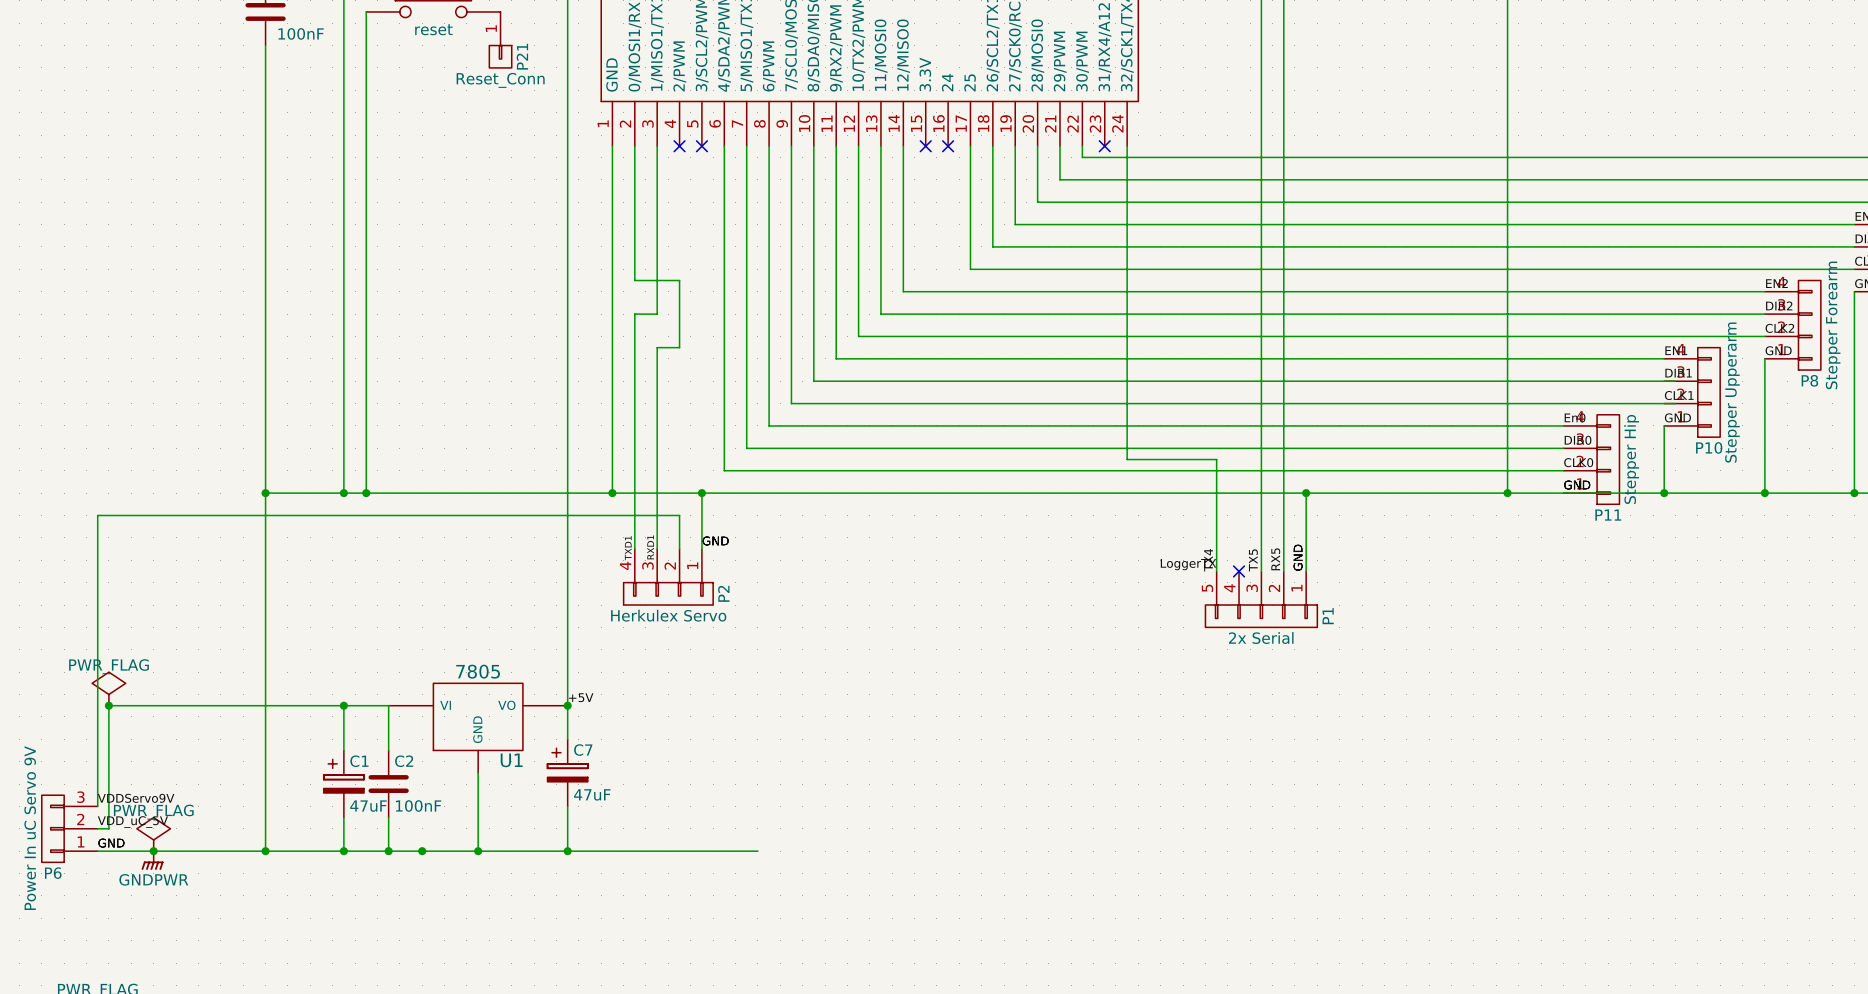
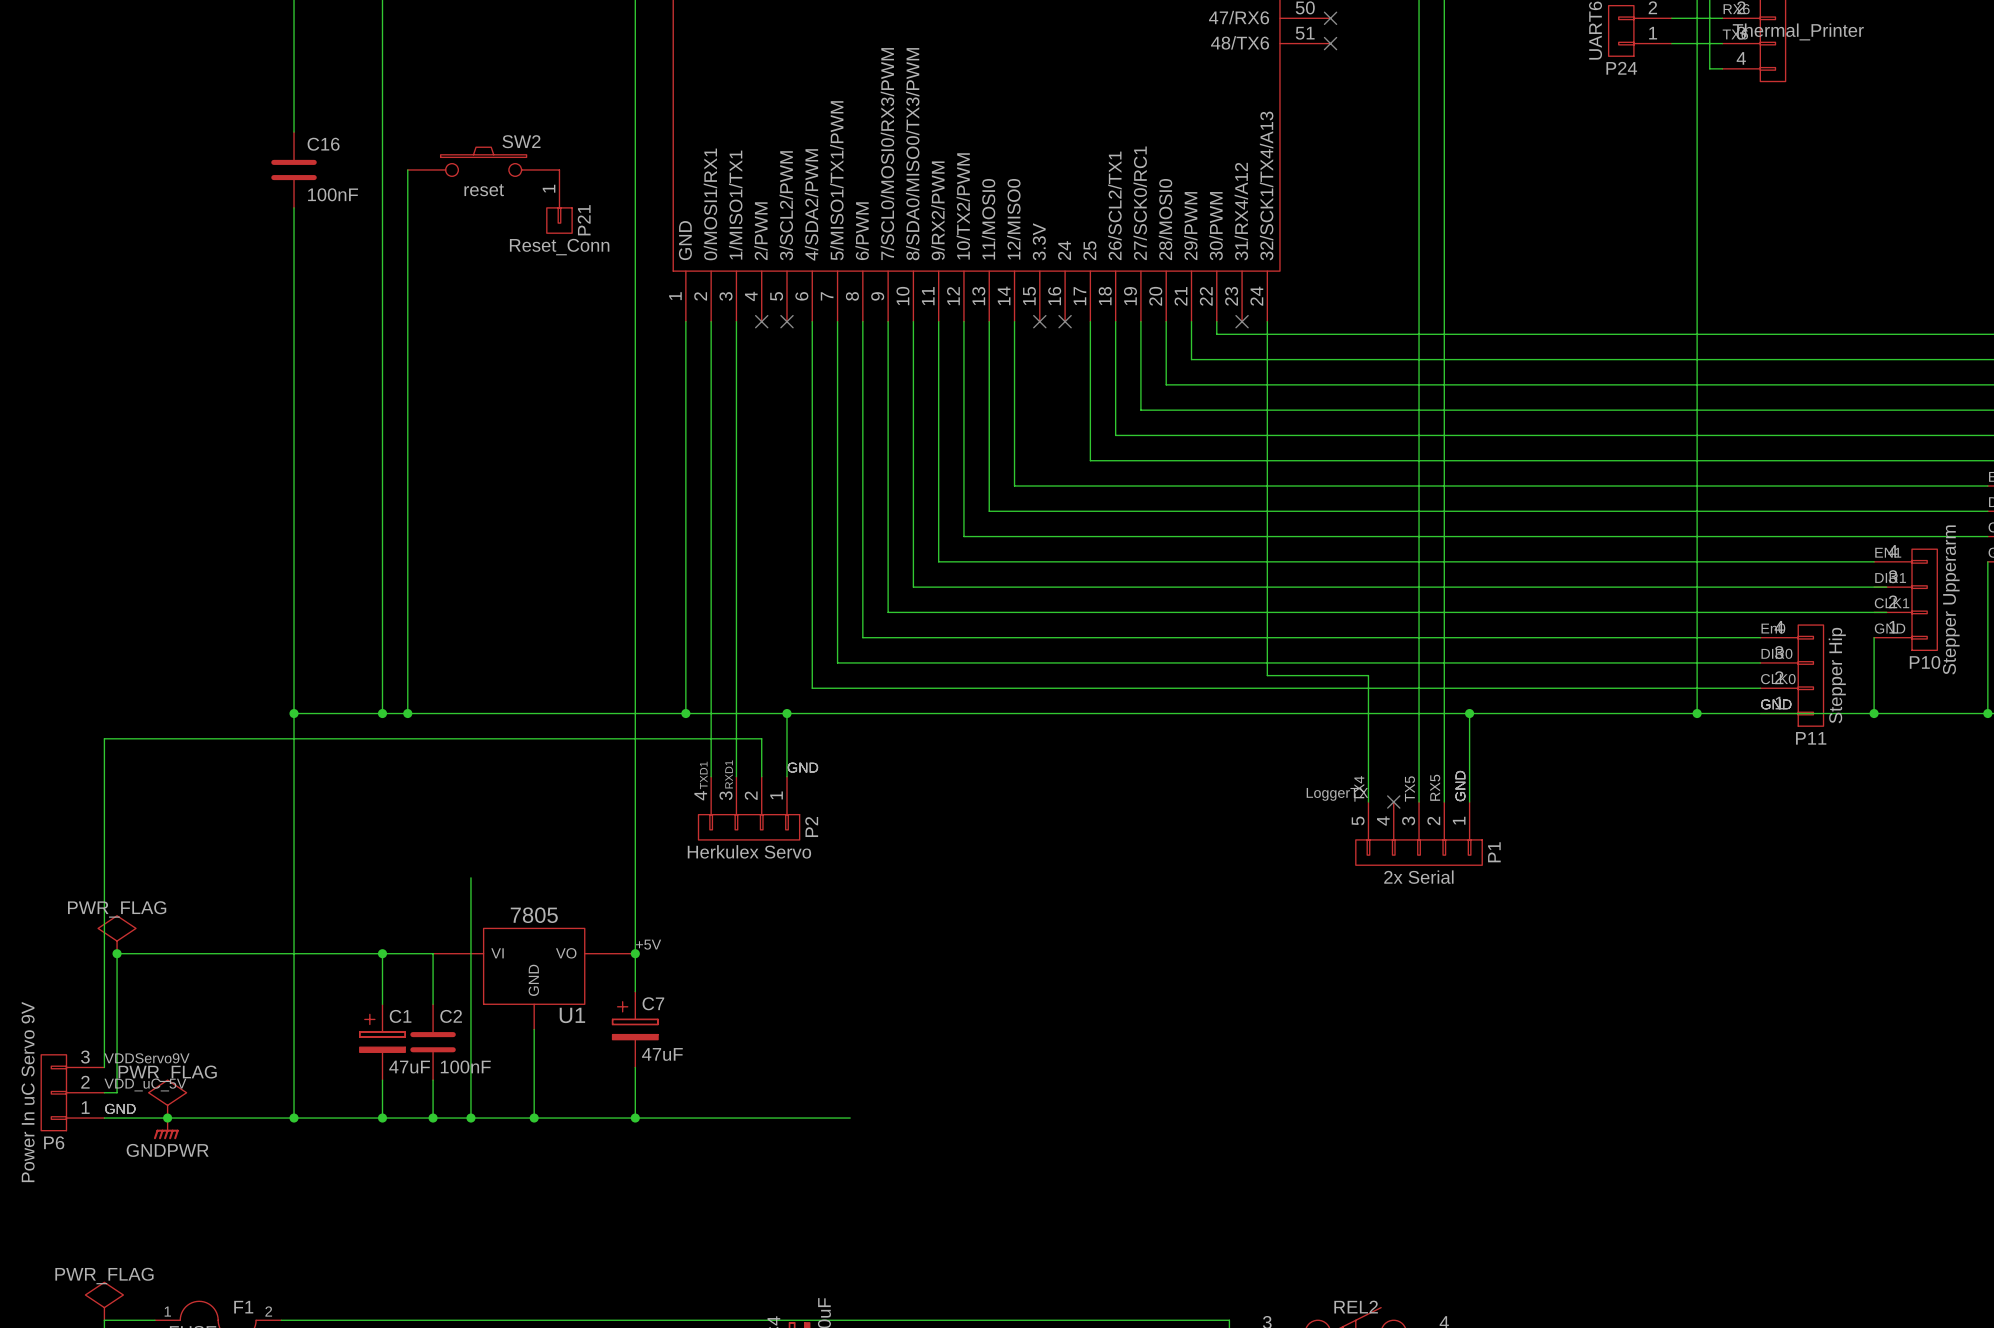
wire: (634, 280) (679, 280) (679, 347) (657, 347) -> (711, 473) (711, 511)
wire: (634, 314) (657, 314) -> (736, 549) (736, 511)
wire: none -> (470, 877) (470, 1118)

